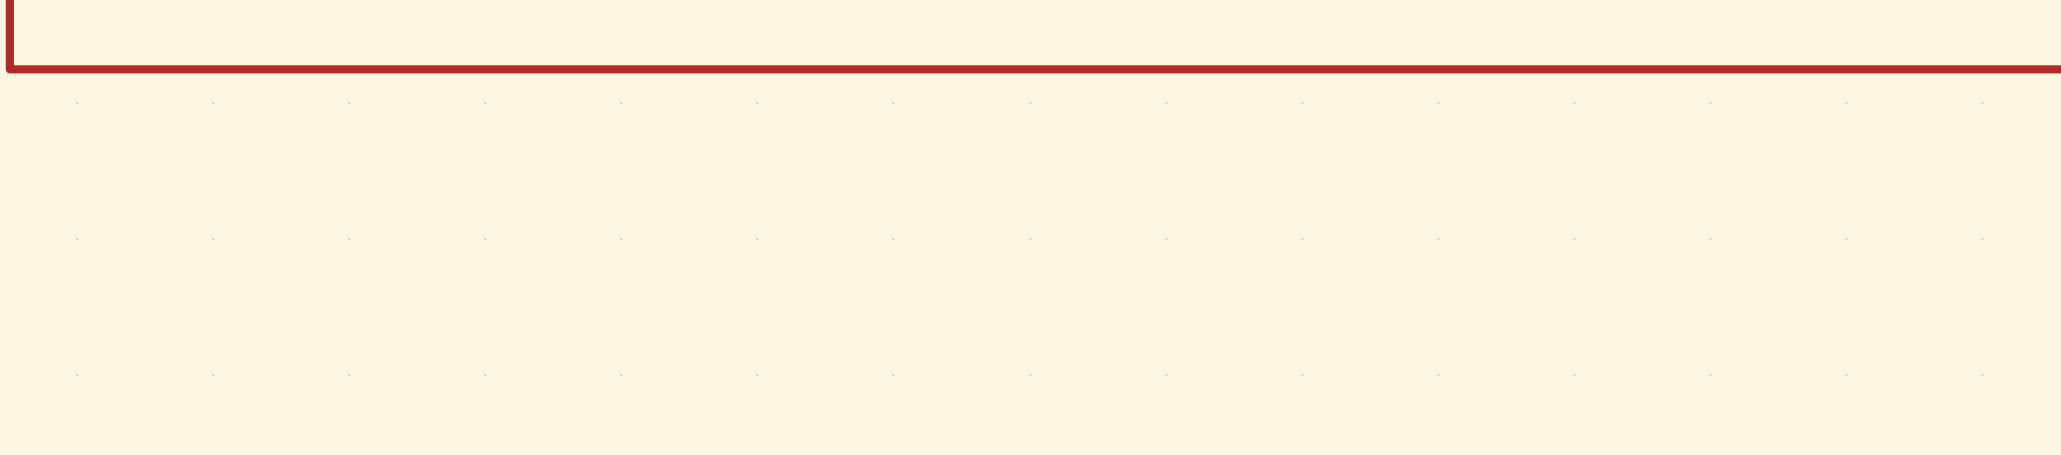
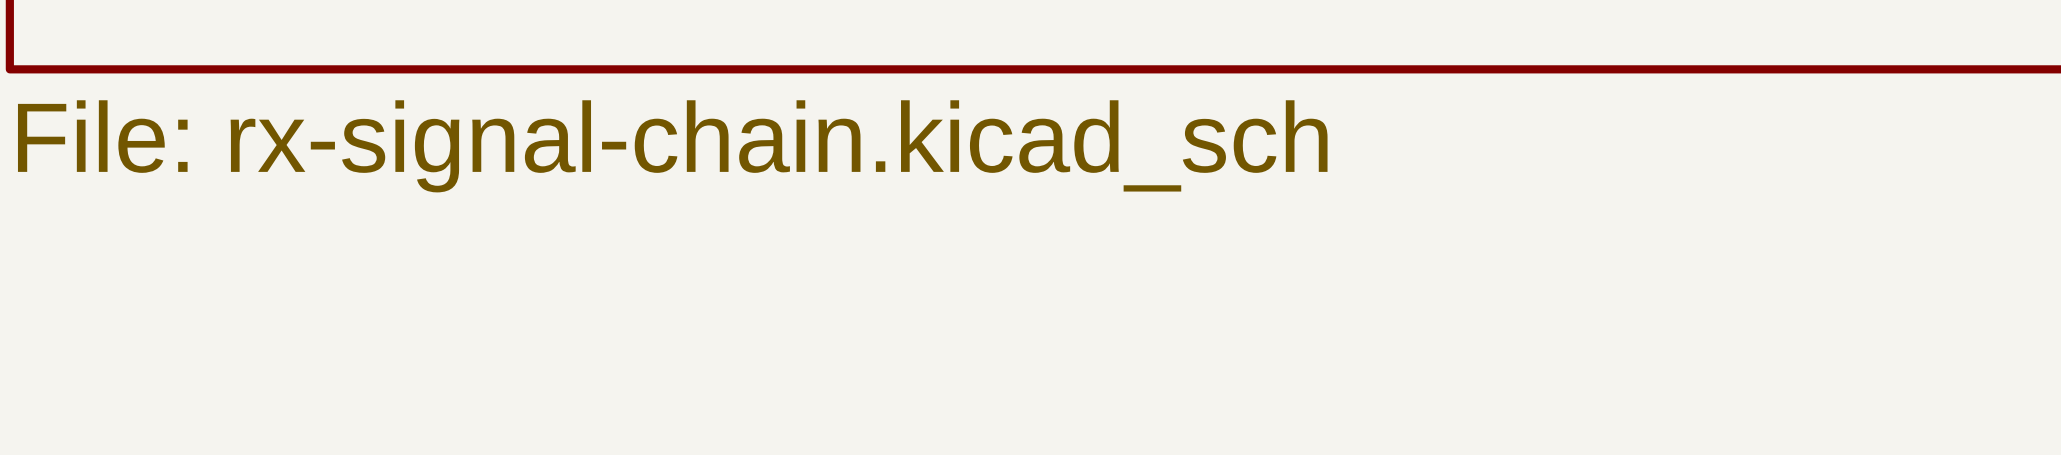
sheet value: none -> File: rx-signal-chain.kicad_sch (672, 146)

